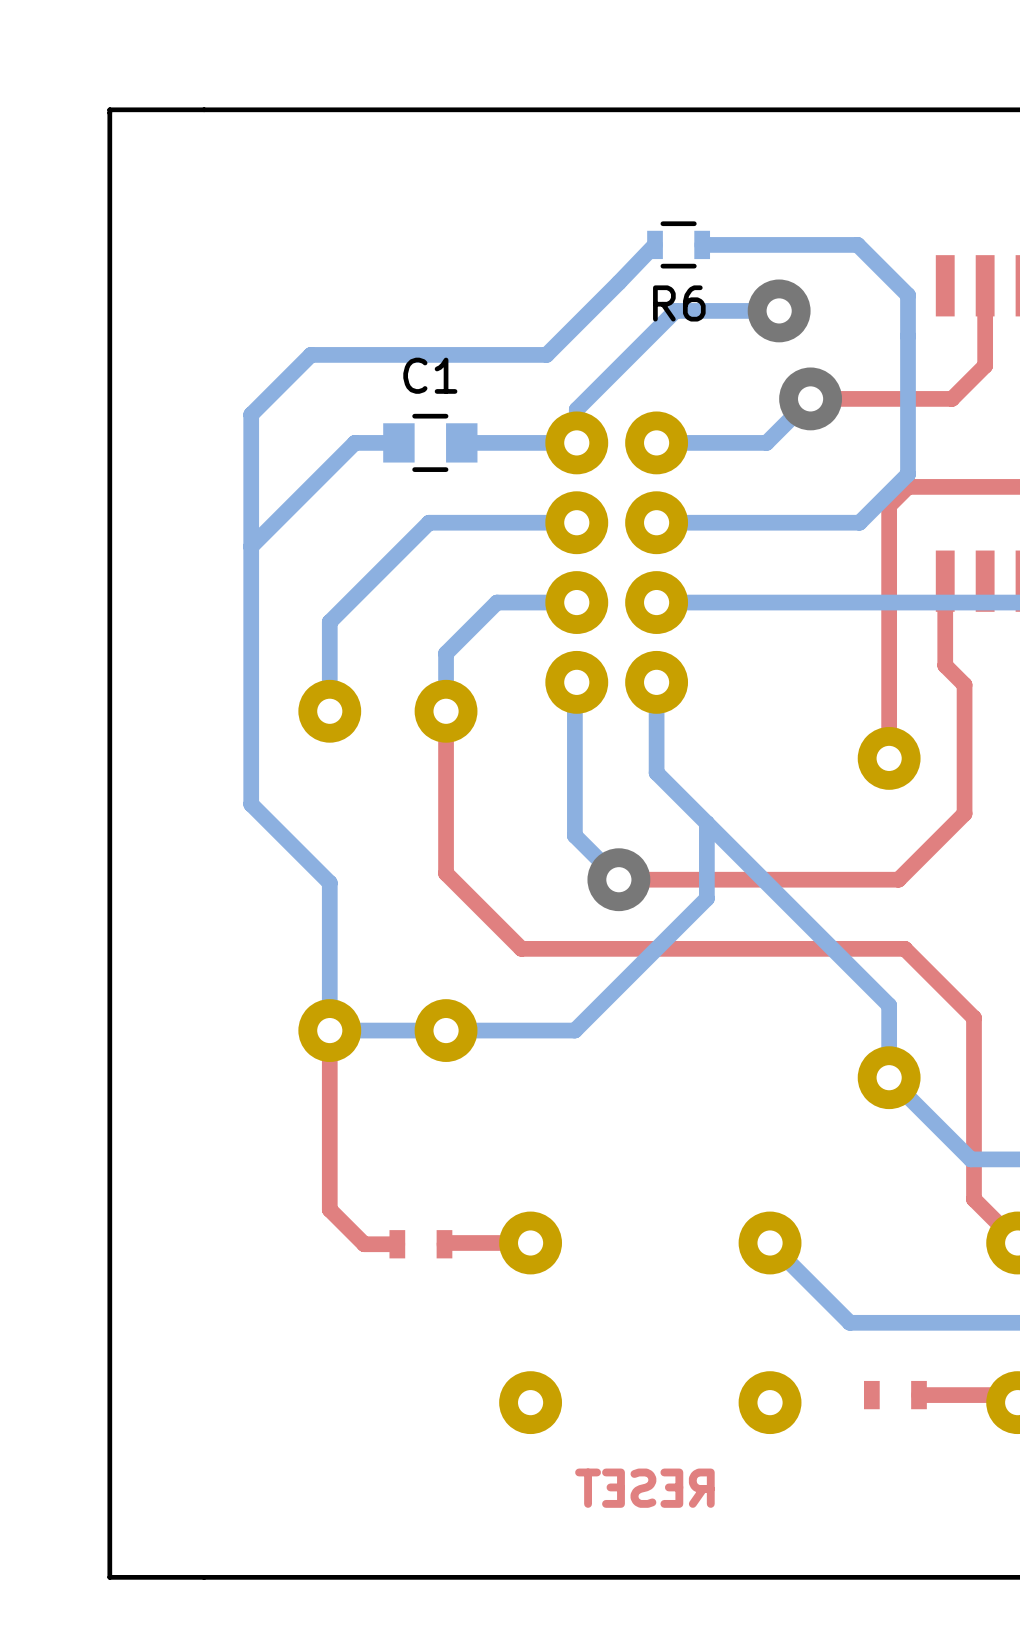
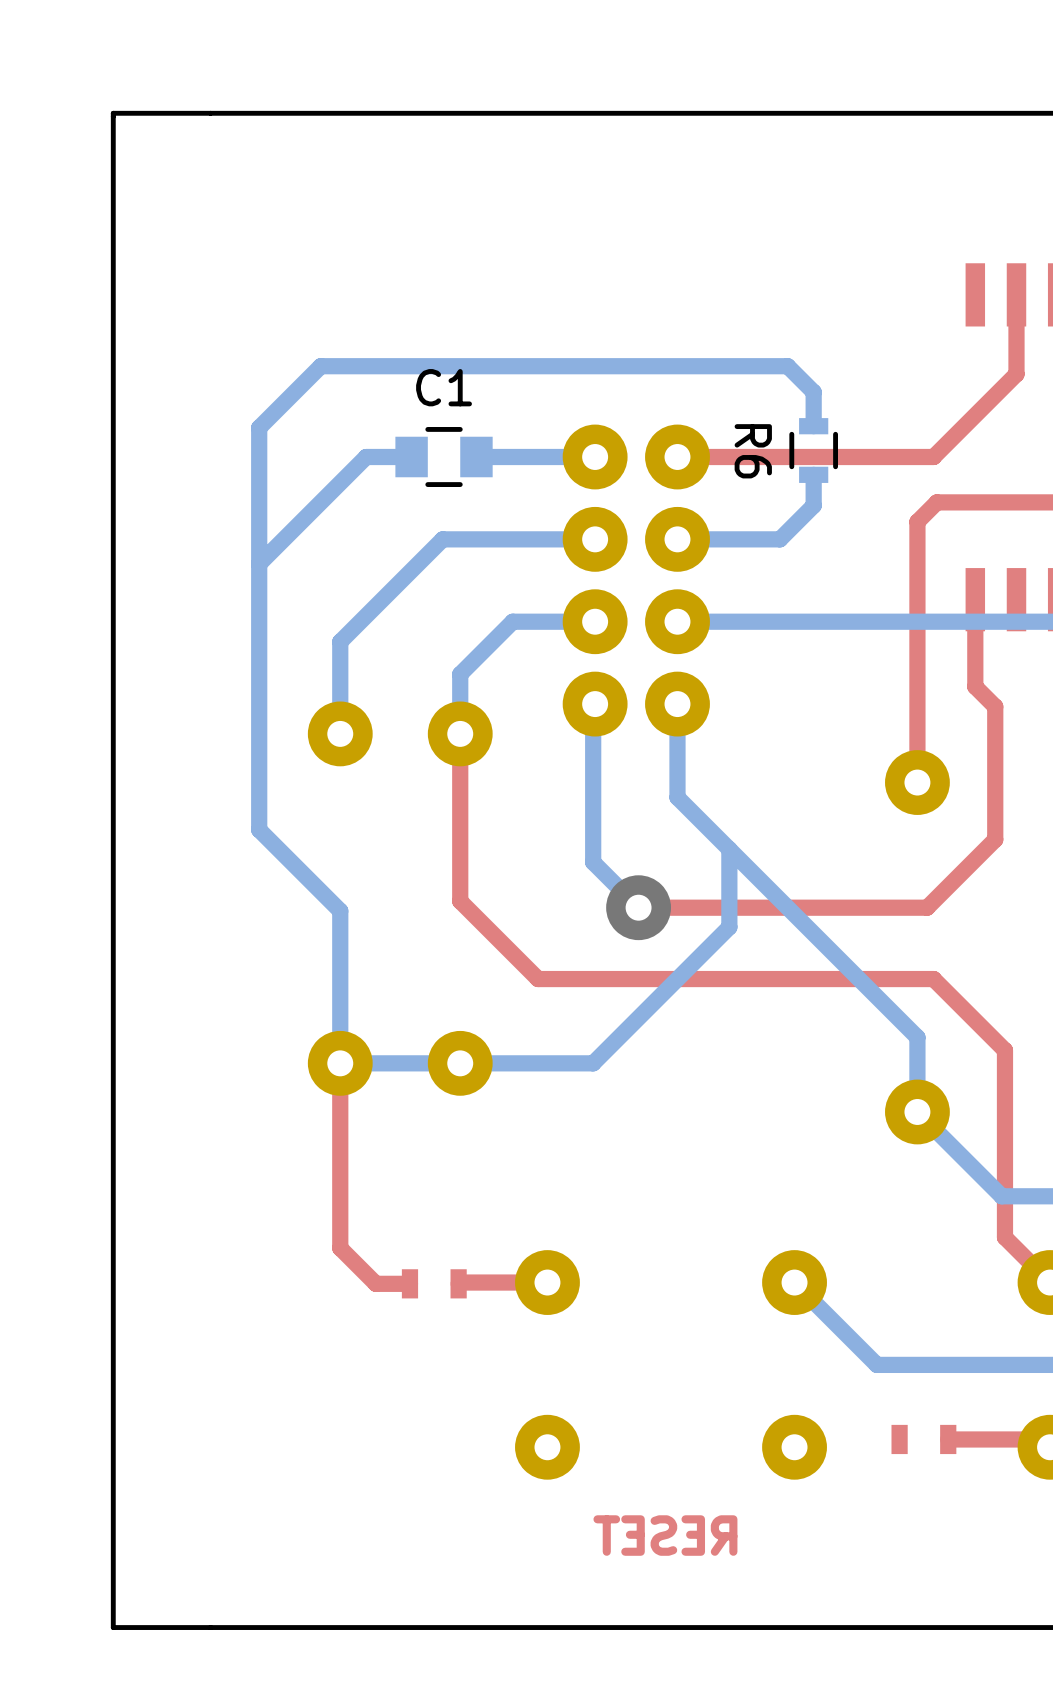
bottom track: (655, 244) (546, 354) -> (813, 426) (813, 392) (787, 366) (564, 366)
R6 rotation: 0° (678, 244) -> 90° clockwise (813, 450)
R6 position: (678, 244) -> (813, 450)
bottom track: (702, 244) (857, 244) (908, 295) (908, 474) (859, 522) (755, 522) -> (813, 474) (813, 505) (779, 539)
bottom track: (779, 310) (675, 310) (576, 409) (576, 442) -> none
via: (779, 310) -> none
top track: (985, 362) (985, 365) (951, 398) (810, 398) -> (1016, 374) (933, 457) (677, 457)
bottom track: (810, 398) (766, 442) (656, 442) -> none
via: (810, 398) -> none

